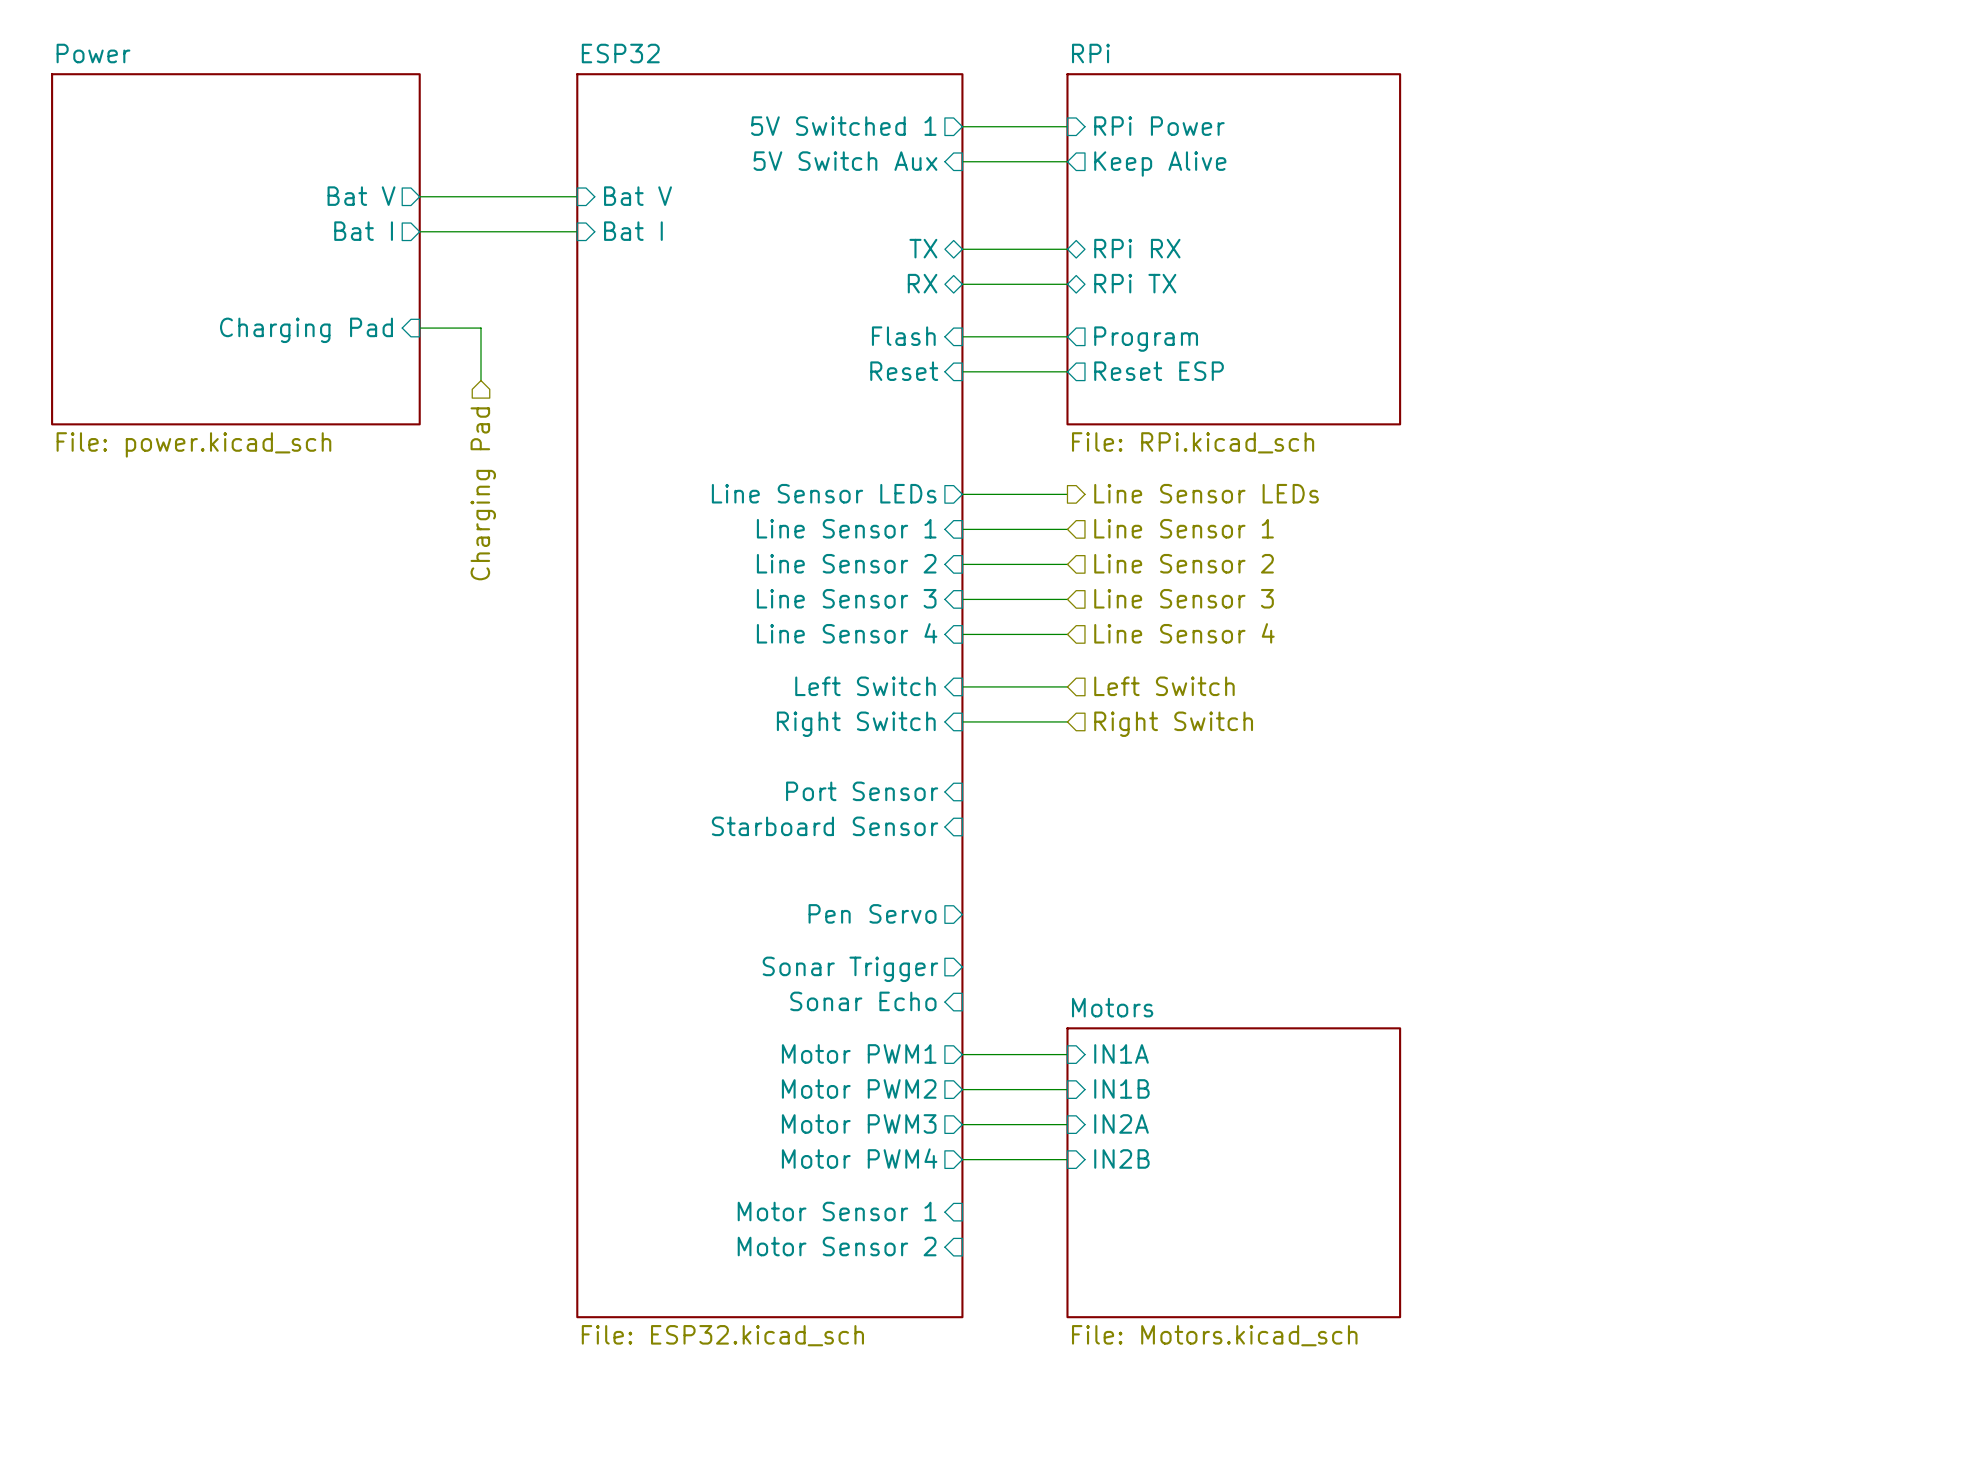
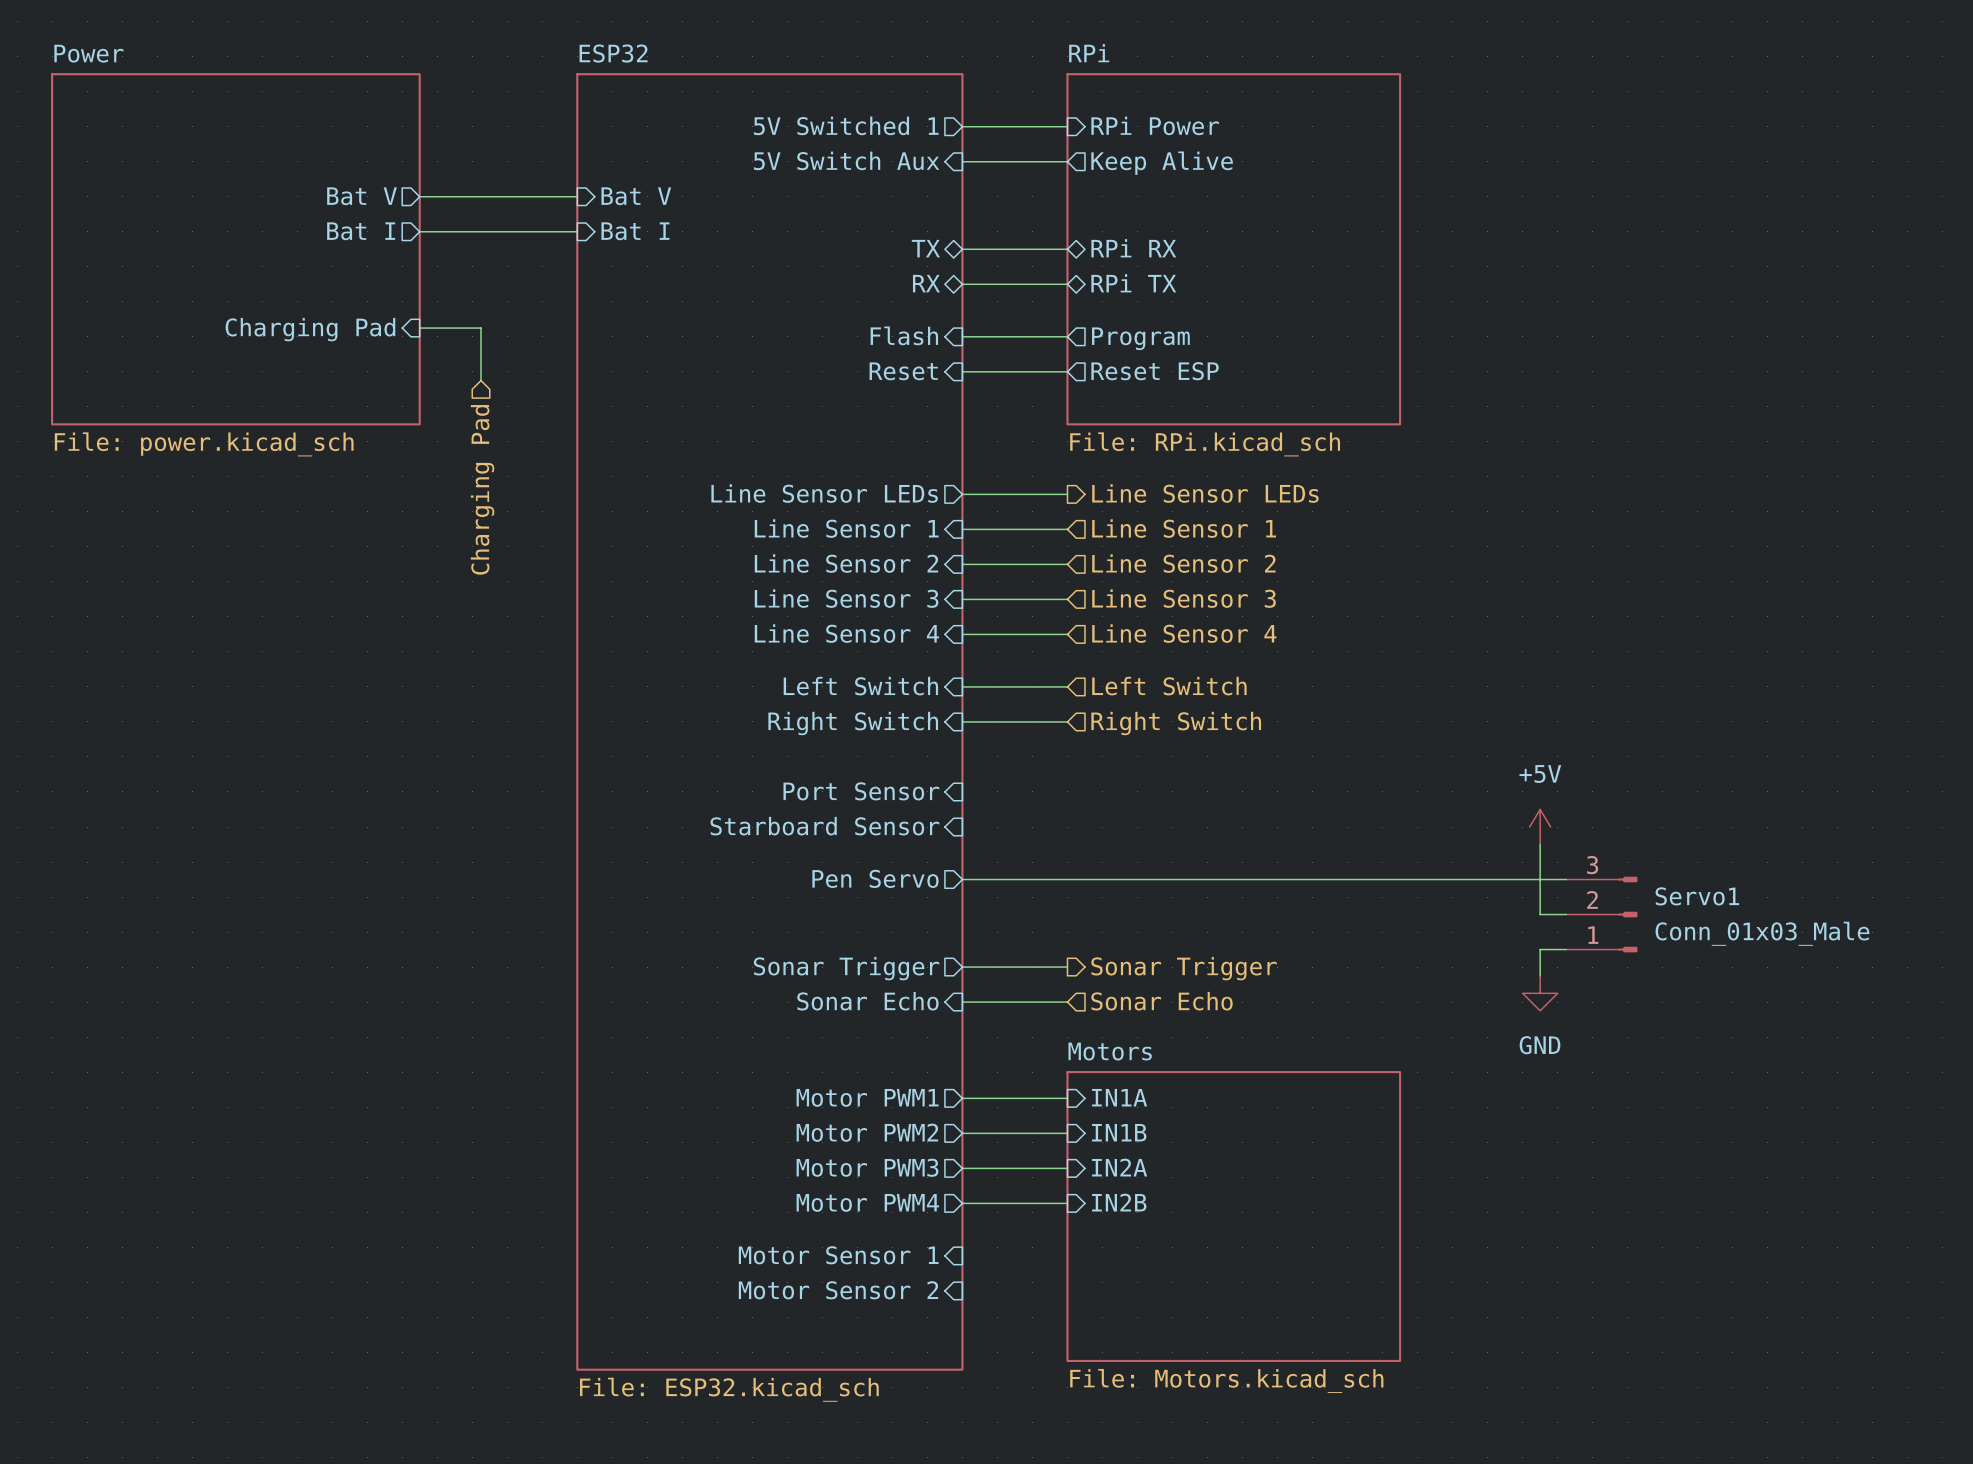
sheet ESP32 shape: [576, 73, 964, 1319] -> [576, 73, 964, 1371]
power symbol: none -> +5V (1540, 827)
wire: none -> (1540, 844) (1540, 914) (1566, 914)
wire: none -> (962, 879) (1566, 879)
sheet pin position: Pen Servo (872, 913) -> Pen Servo (875, 878)
Servo1: none -> Conn_01x03_Male (1601, 914)
wire: none -> (1566, 949) (1540, 949) (1540, 975)
wire: none -> (962, 967) (1067, 967)
hierarchical label: none -> Sonar Trigger (1184, 968)
power symbol: none -> GND (1540, 993)
hierarchical label: none -> Sonar Echo (1162, 1001)
wire: none -> (962, 1002) (1067, 1002)
sheet pin position: Motor PWM1 (859, 1053) -> Motor PWM1 (867, 1097)
sheet pin position: IN1A (1121, 1053) -> IN1A (1119, 1097)
wire: (962, 1054) (1067, 1054) -> (962, 1098) (1067, 1098)
sheet pin position: Motor PWM2 (859, 1088) -> Motor PWM2 (867, 1132)
sheet pin position: IN1B (1121, 1088) -> IN1B (1119, 1132)
wire: (962, 1089) (1067, 1089) -> (962, 1133) (1067, 1133)
sheet pin position: Motor PWM3 (859, 1123) -> Motor PWM3 (867, 1167)
sheet pin position: IN2A (1121, 1123) -> IN2A (1119, 1167)
wire: (962, 1124) (1067, 1124) -> (962, 1168) (1067, 1168)
sheet pin position: Motor PWM4 (859, 1158) -> Motor PWM4 (867, 1202)
sheet pin position: IN2B (1121, 1158) -> IN2B (1119, 1202)
wire: (962, 1159) (1067, 1159) -> (962, 1203) (1067, 1203)
sheet Motors position: (1233, 1172) -> (1233, 1216)
sheet pin position: Motor Sensor 1 (837, 1211) -> Motor Sensor 1 (838, 1255)
sheet pin position: Motor Sensor 2 (837, 1246) -> Motor Sensor 2 (838, 1290)

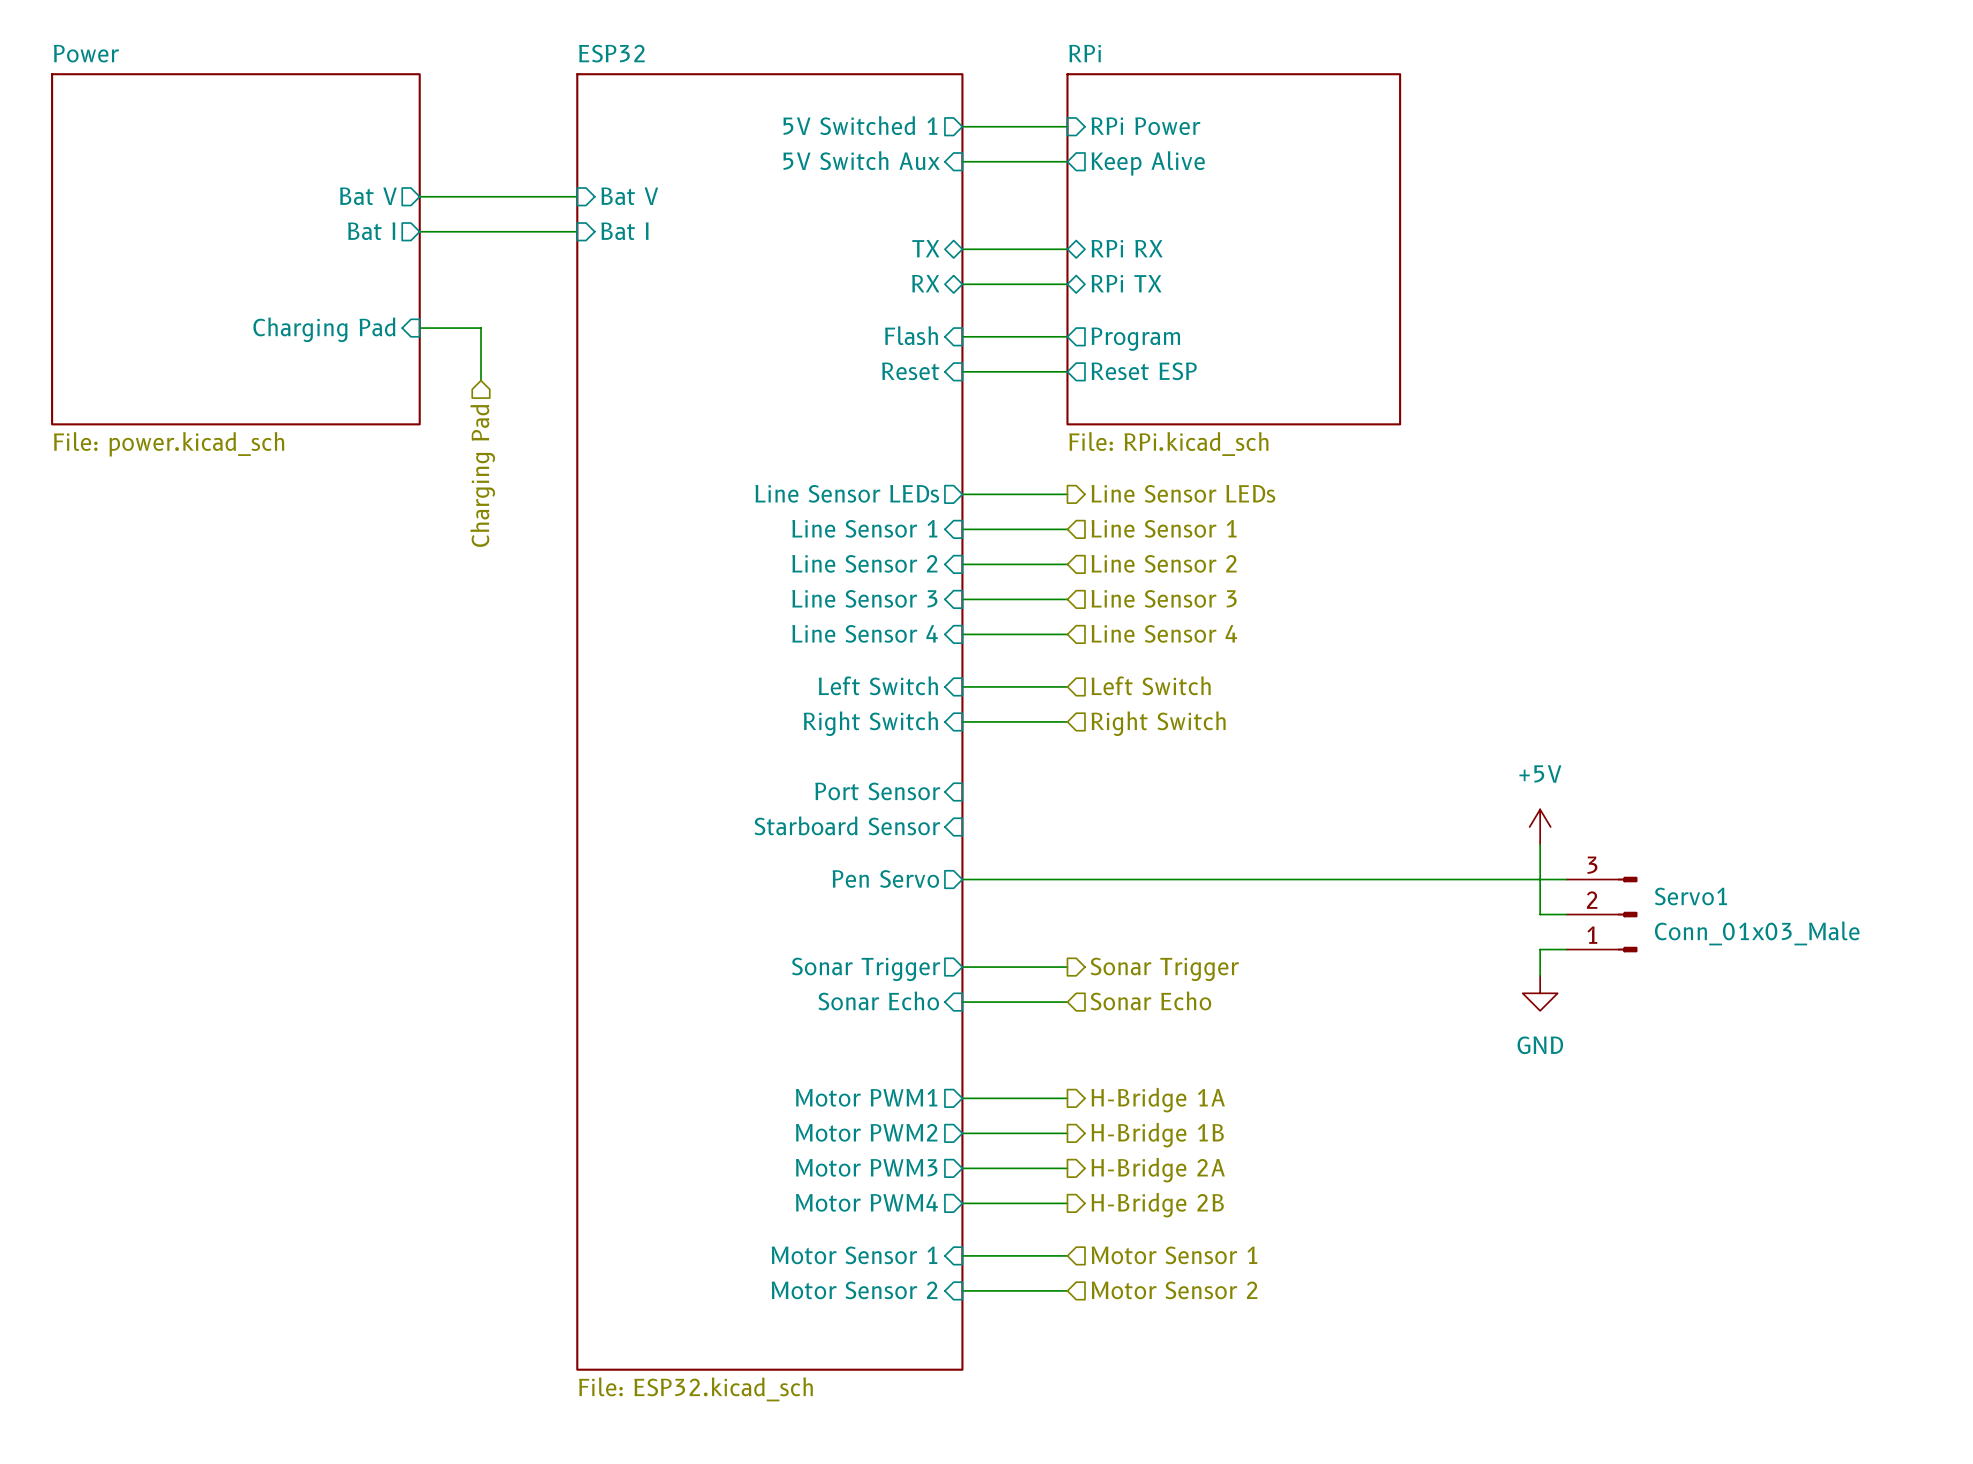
sheet pin: IN1A (1119, 1097) -> none
hierarchical label: none -> H-Bridge 1A (1158, 1100)
sheet pin: IN1B (1119, 1132) -> none
hierarchical label: none -> H-Bridge 1B (1157, 1135)
sheet pin: IN2A (1119, 1167) -> none
hierarchical label: none -> H-Bridge 2A (1158, 1170)
sheet pin: IN2B (1119, 1202) -> none
hierarchical label: none -> H-Bridge 2B (1157, 1205)
sheet Motors: File: Motors.kicad_sch (1233, 1216) -> none
wire: none -> (962, 1255) (1067, 1255)
hierarchical label: none -> Motor Sensor 1 (1174, 1255)
wire: none -> (962, 1290) (1067, 1290)
hierarchical label: none -> Motor Sensor 2 (1174, 1290)

